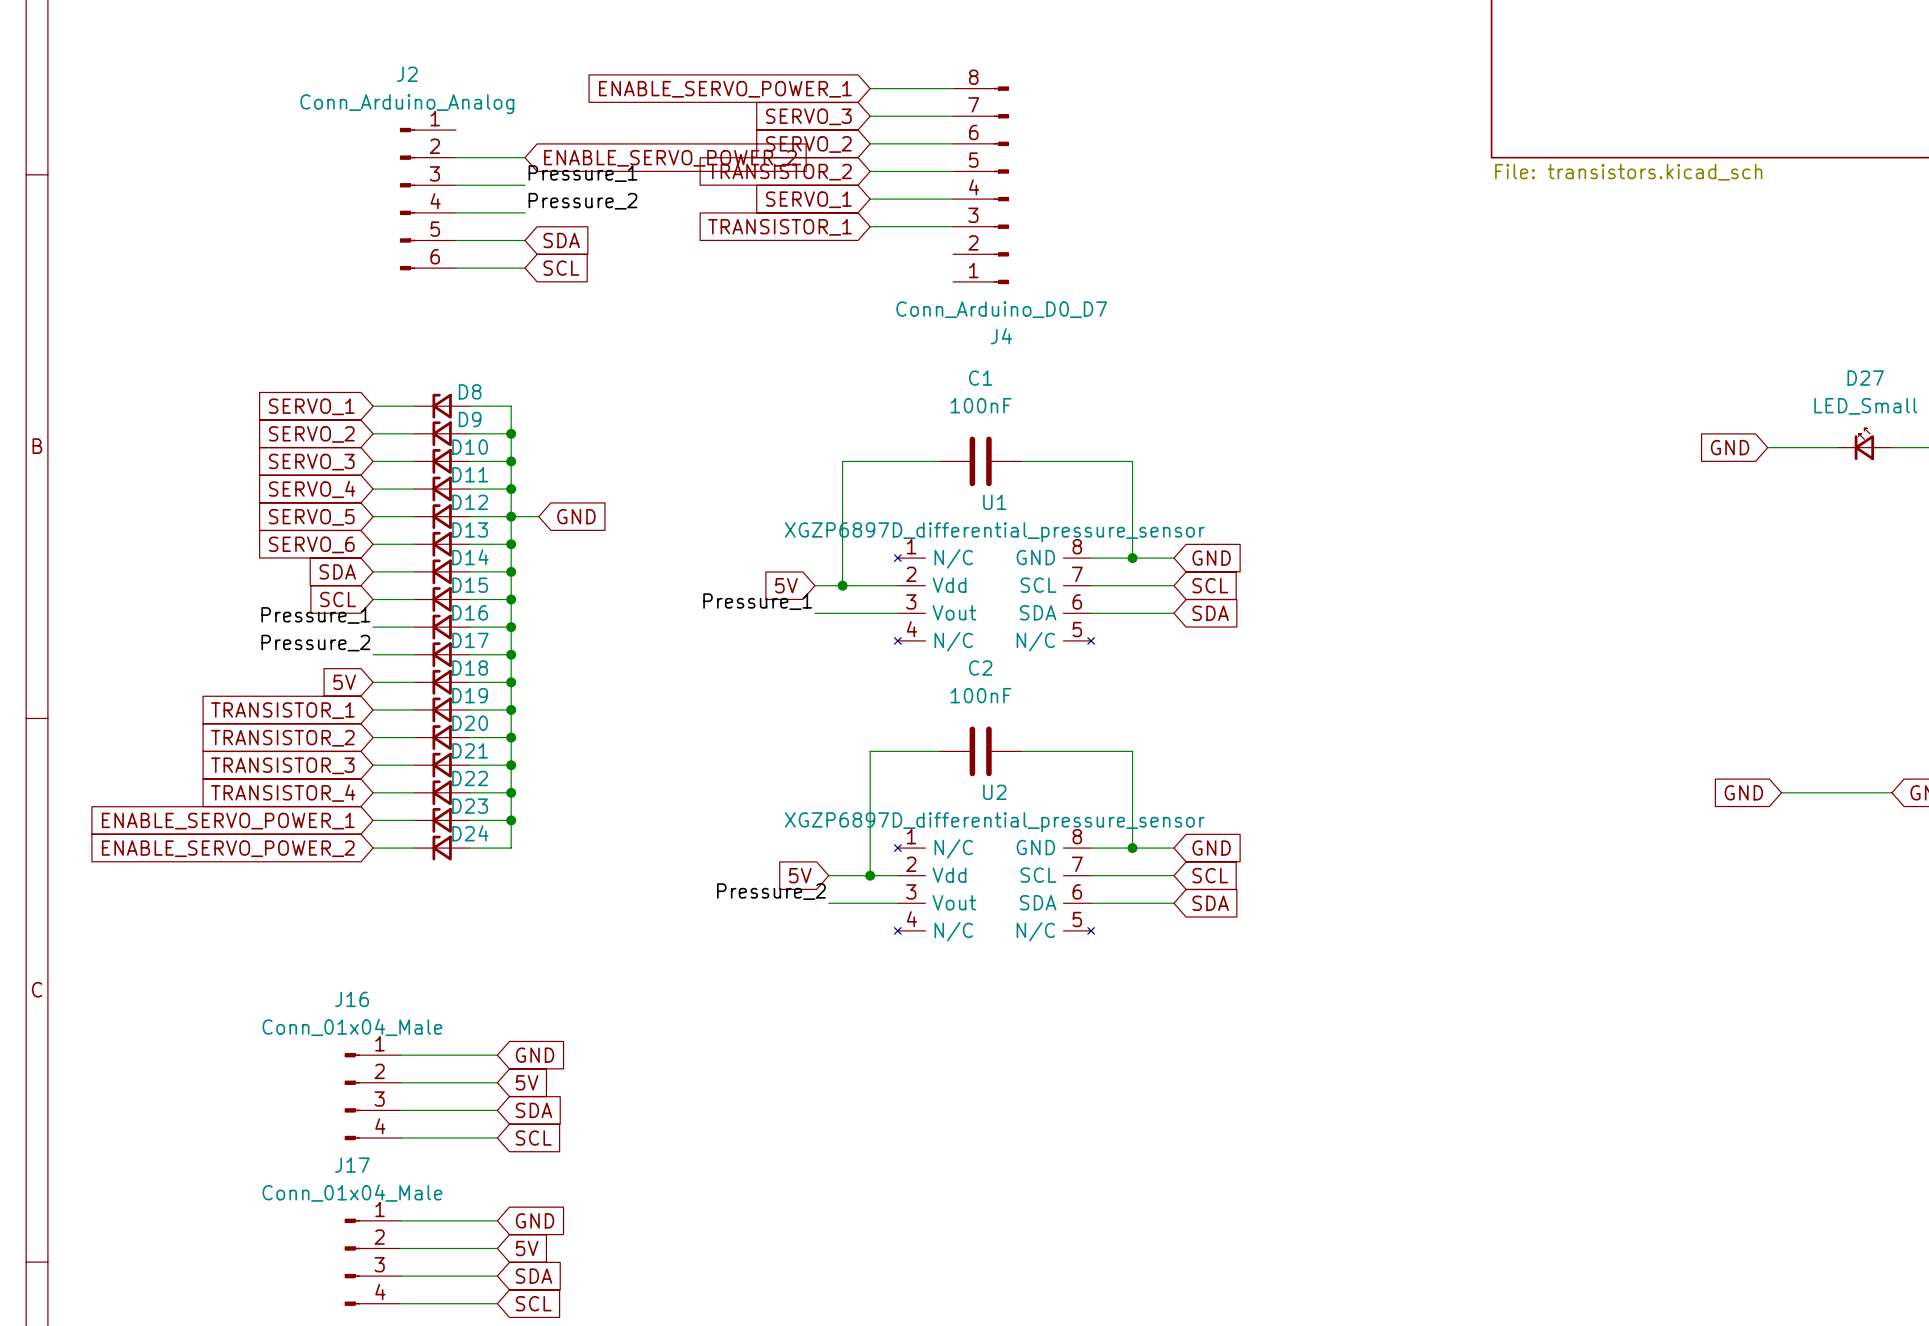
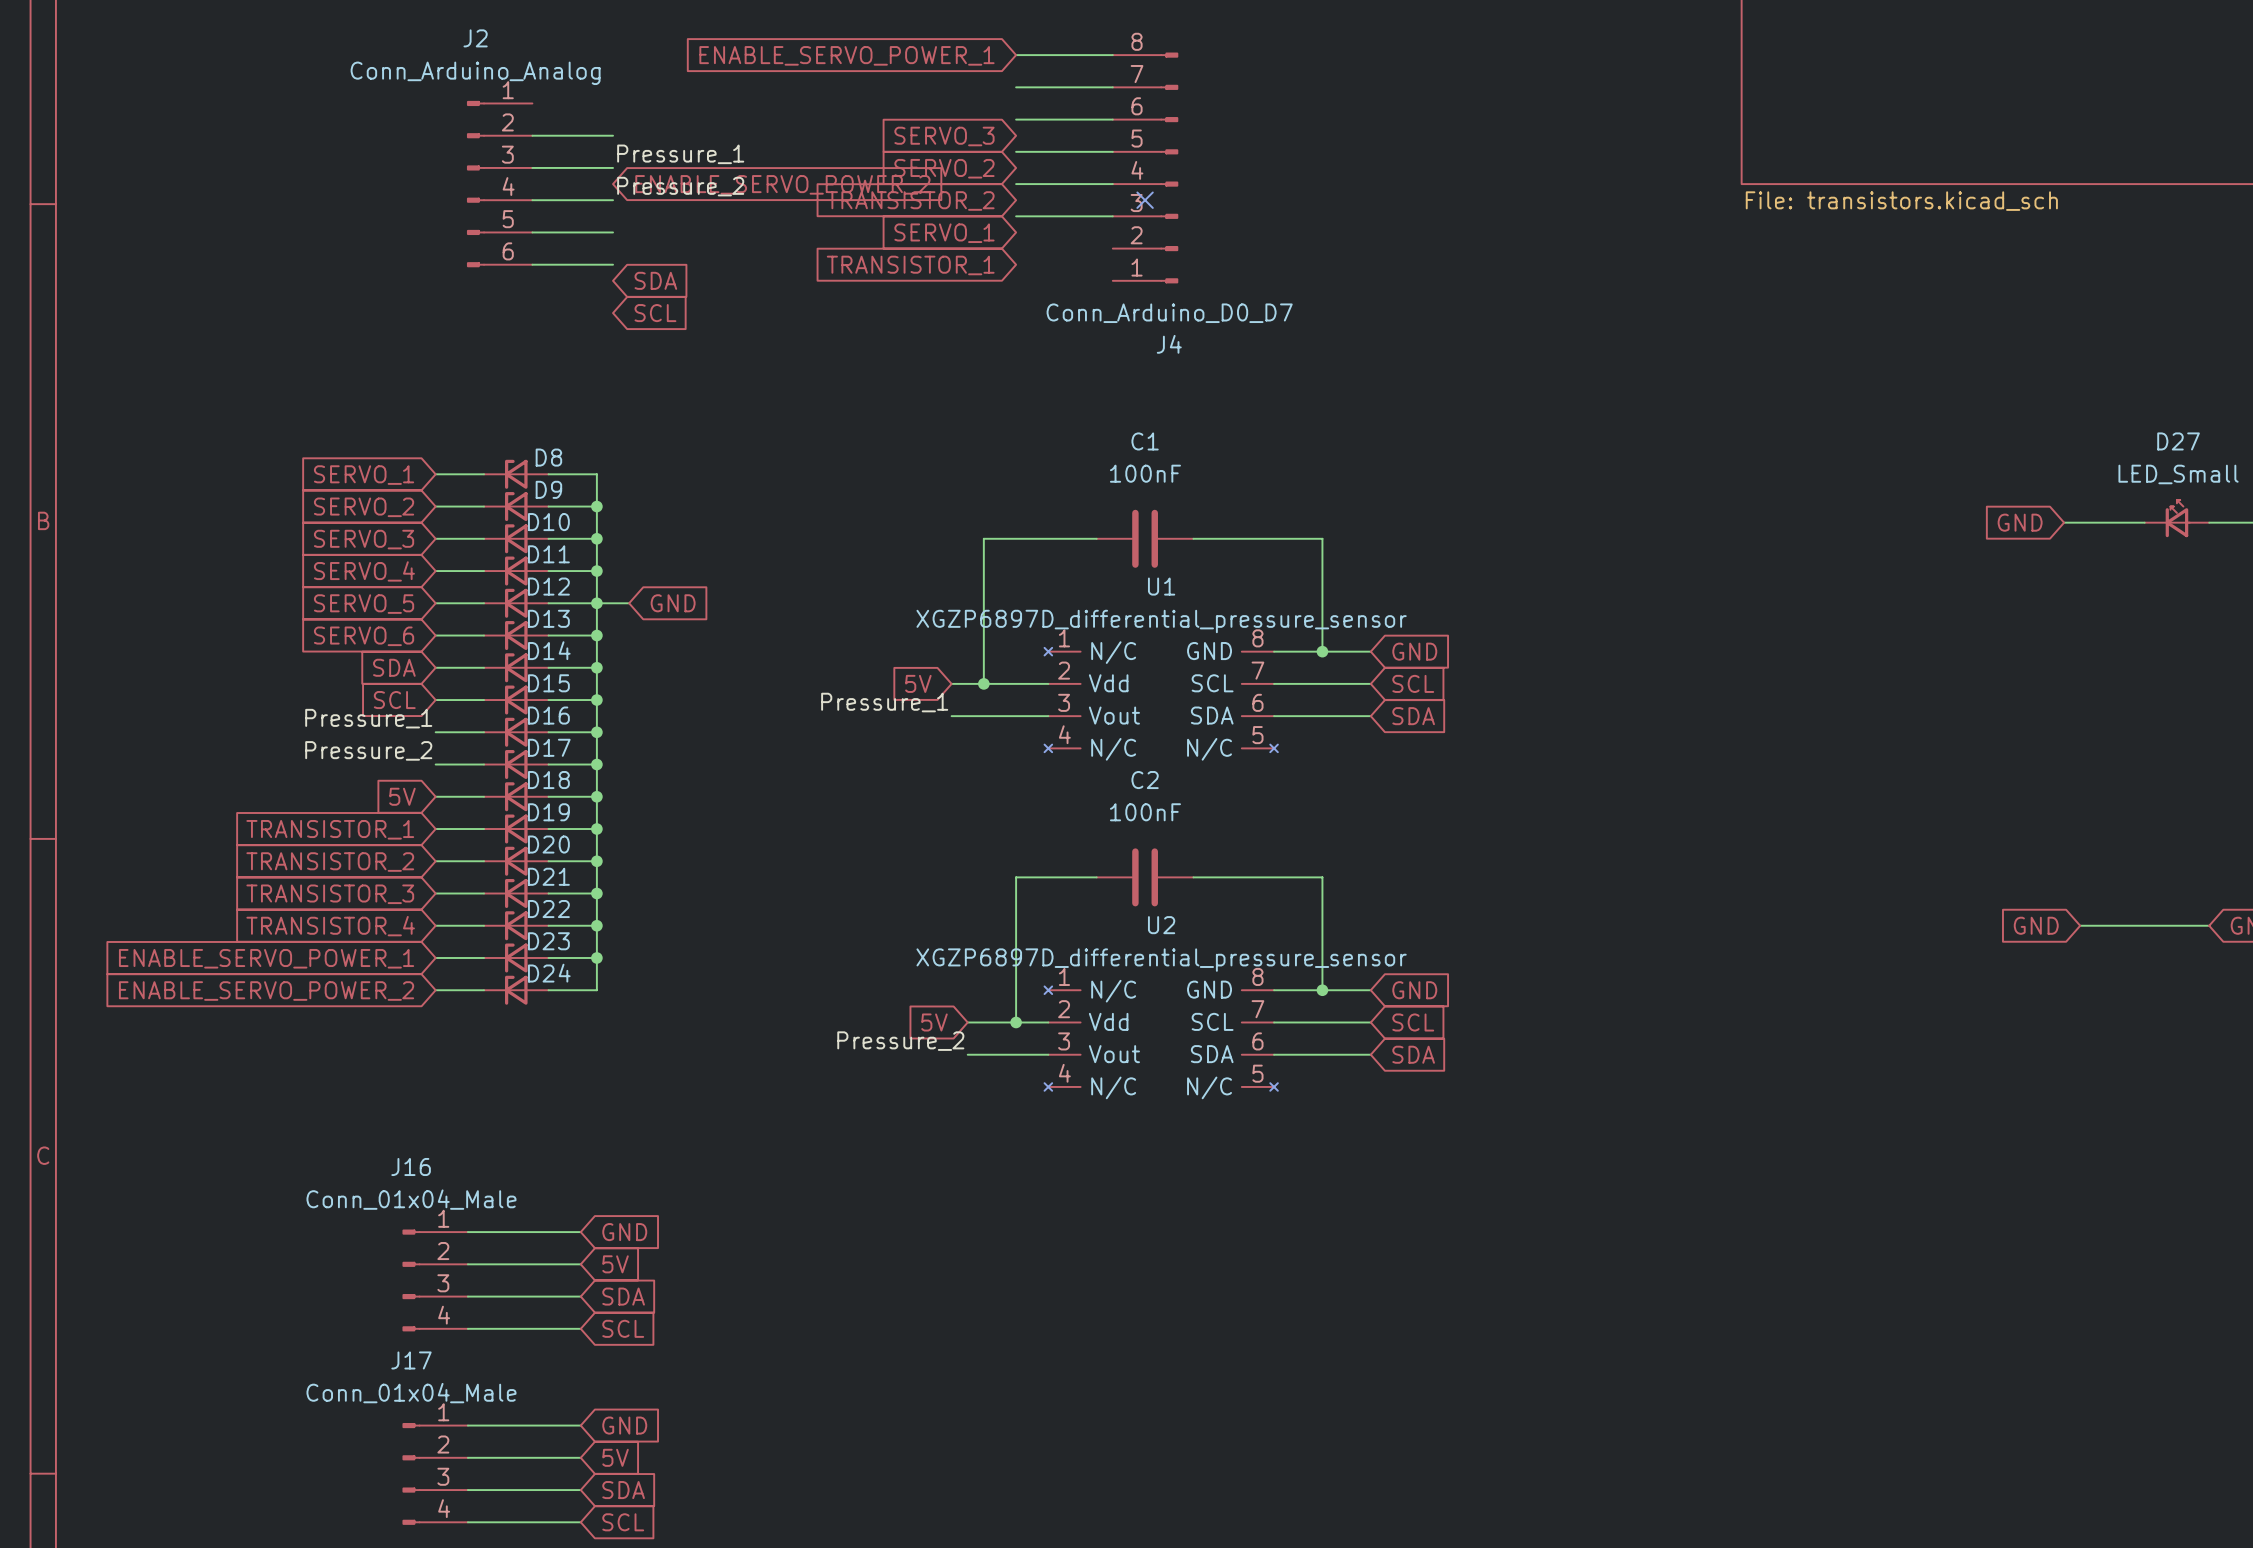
wire: (870, 88) (953, 88) -> (1016, 55) (1112, 55)
global label position: ENABLE_SERVO_POWER_1 (725, 89) -> ENABLE_SERVO_POWER_1 (846, 55)
wire: (870, 116) (953, 116) -> (1016, 87) (1112, 87)
wire: (870, 143) (953, 143) -> (1016, 119) (1112, 119)
wire: (455, 157) (524, 157) -> (532, 135) (613, 135)
wire: (870, 171) (953, 171) -> (1016, 151) (1112, 151)
no-connect mark: none -> (1145, 200)
label position: Pressure_1 (582, 173) -> Pressure_1 (680, 154)
wire: (455, 185) (524, 185) -> (532, 167) (613, 167)
J4 position: (981, 185) -> (1145, 167)
J2 position: (427, 199) -> (499, 184)
wire: (870, 199) (953, 199) -> (1016, 184) (1112, 184)
label position: Pressure_2 (582, 201) -> Pressure_2 (680, 186)
wire: (455, 212) (524, 212) -> (532, 200) (613, 200)
wire: (870, 226) (953, 226) -> (1016, 216) (1112, 216)
wire: (455, 240) (524, 240) -> (532, 232) (613, 232)
wire: (455, 268) (524, 268) -> (532, 264) (613, 264)

